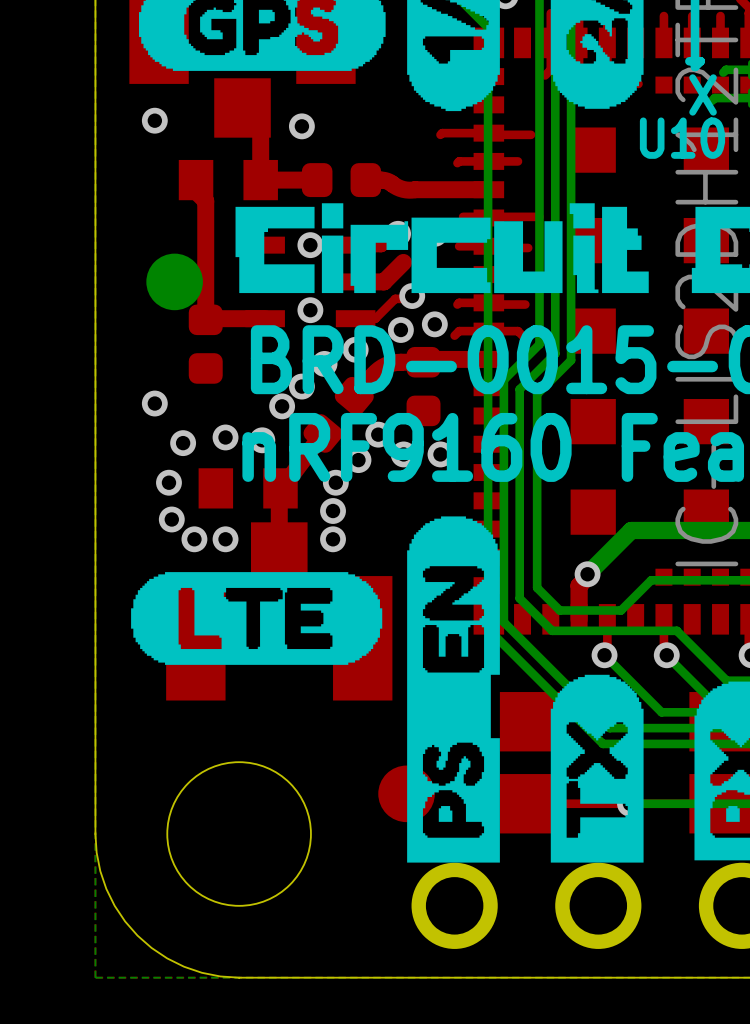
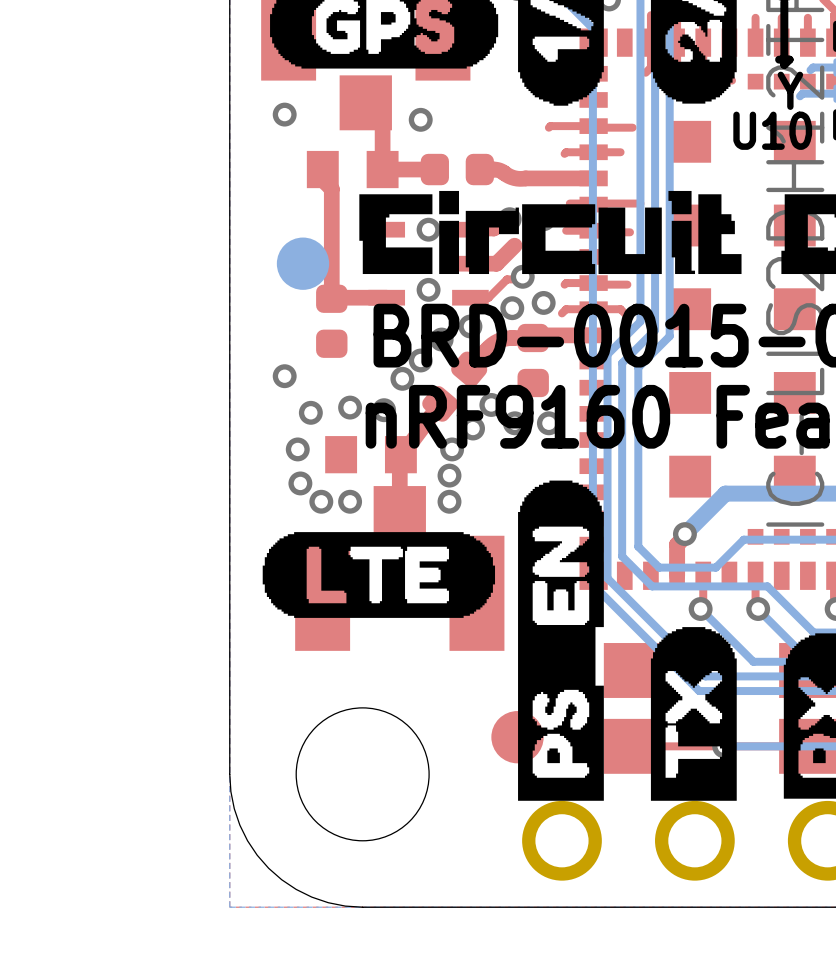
text: X (703, 94) -> Y (790, 90)

